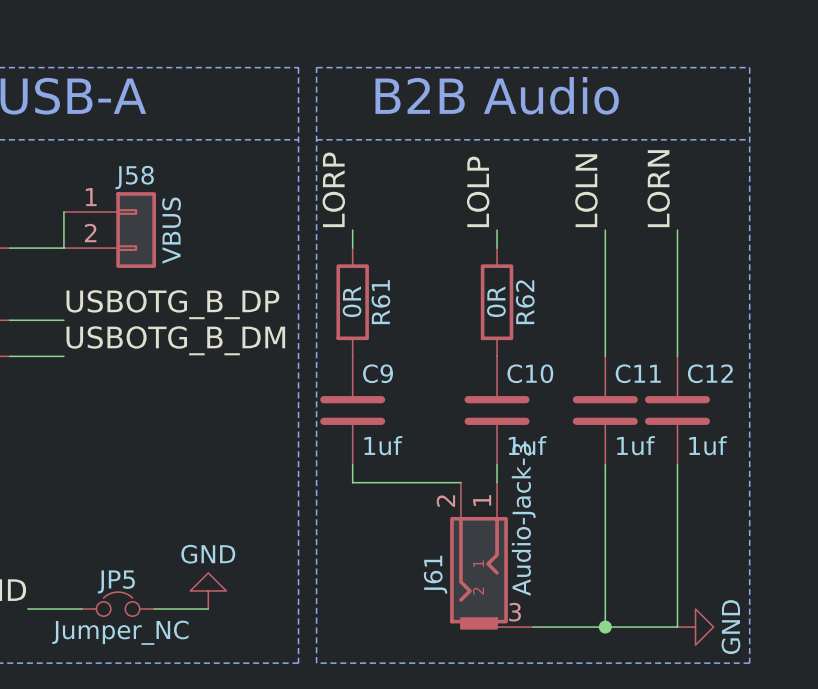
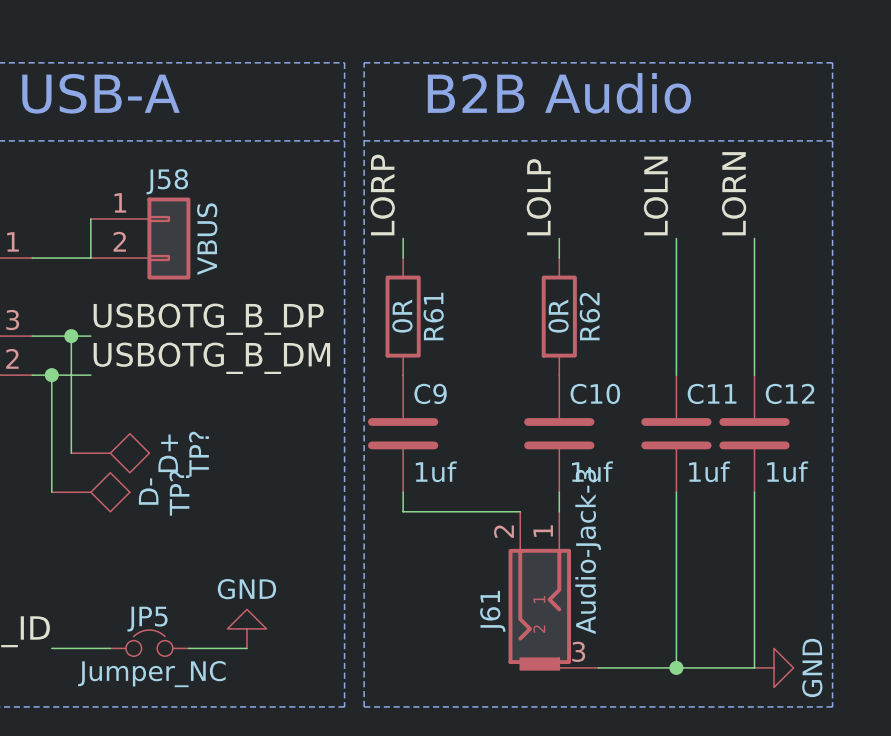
wire: none -> (71, 336) (71, 453)
junction: none -> (71, 336)
wire: none -> (51, 375) (51, 492)
junction: none -> (51, 375)
TP?: none -> D+ (110, 453)
TP?: none -> D- (90, 492)

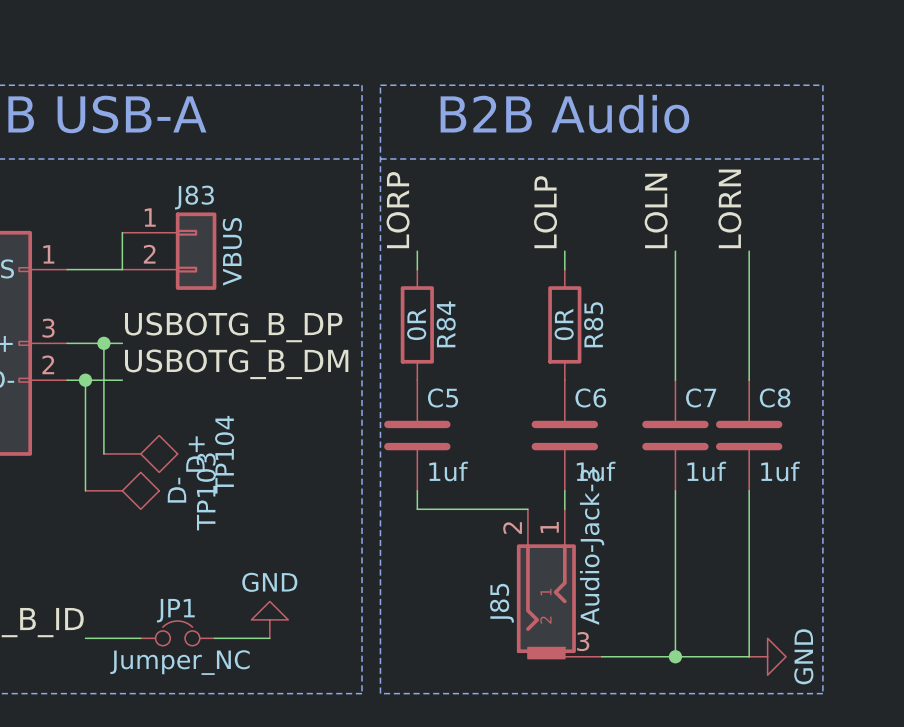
J58 name: J58 (167, 181) -> J83 (194, 197)
R61 name: R61 (433, 316) -> R84 (446, 324)
R62 name: R62 (589, 316) -> R85 (593, 324)
C9 name: C9 (430, 393) -> C5 (443, 397)
C10 name: C10 (595, 393) -> C6 (590, 397)
C11 name: C11 (712, 393) -> C7 (701, 397)
C12 name: C12 (790, 393) -> C8 (775, 397)
TP? name: TP? (198, 454) -> TP104 (224, 454)
TP? name: TP? (179, 493) -> TP103 (206, 491)
J61 name: J61 (492, 611) -> J85 (501, 603)
JP5 name: JP5 (147, 619) -> JP1 (175, 610)

